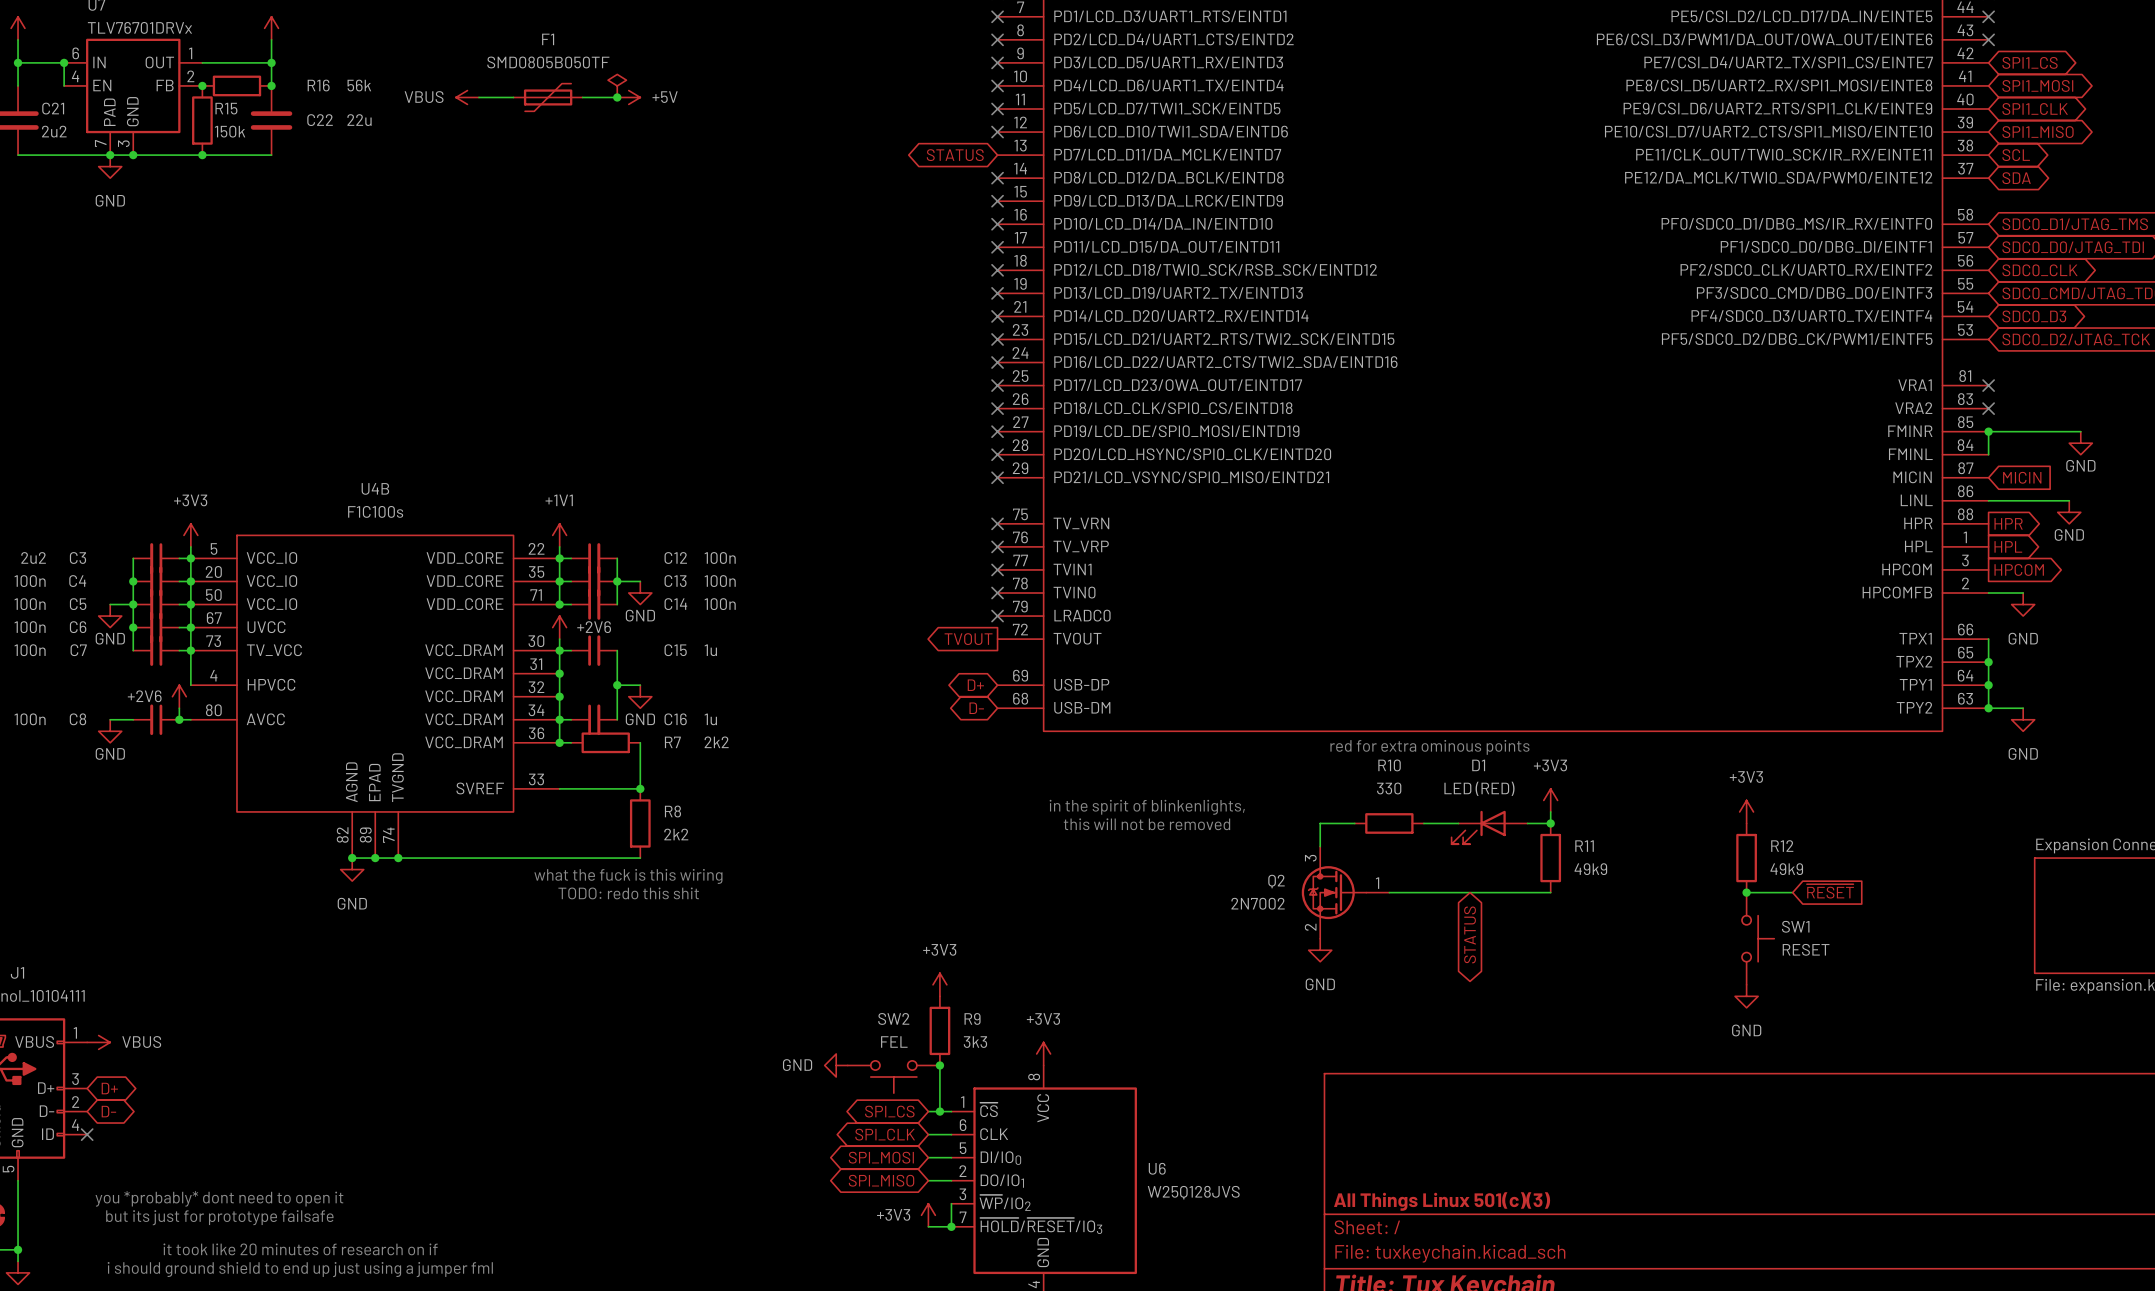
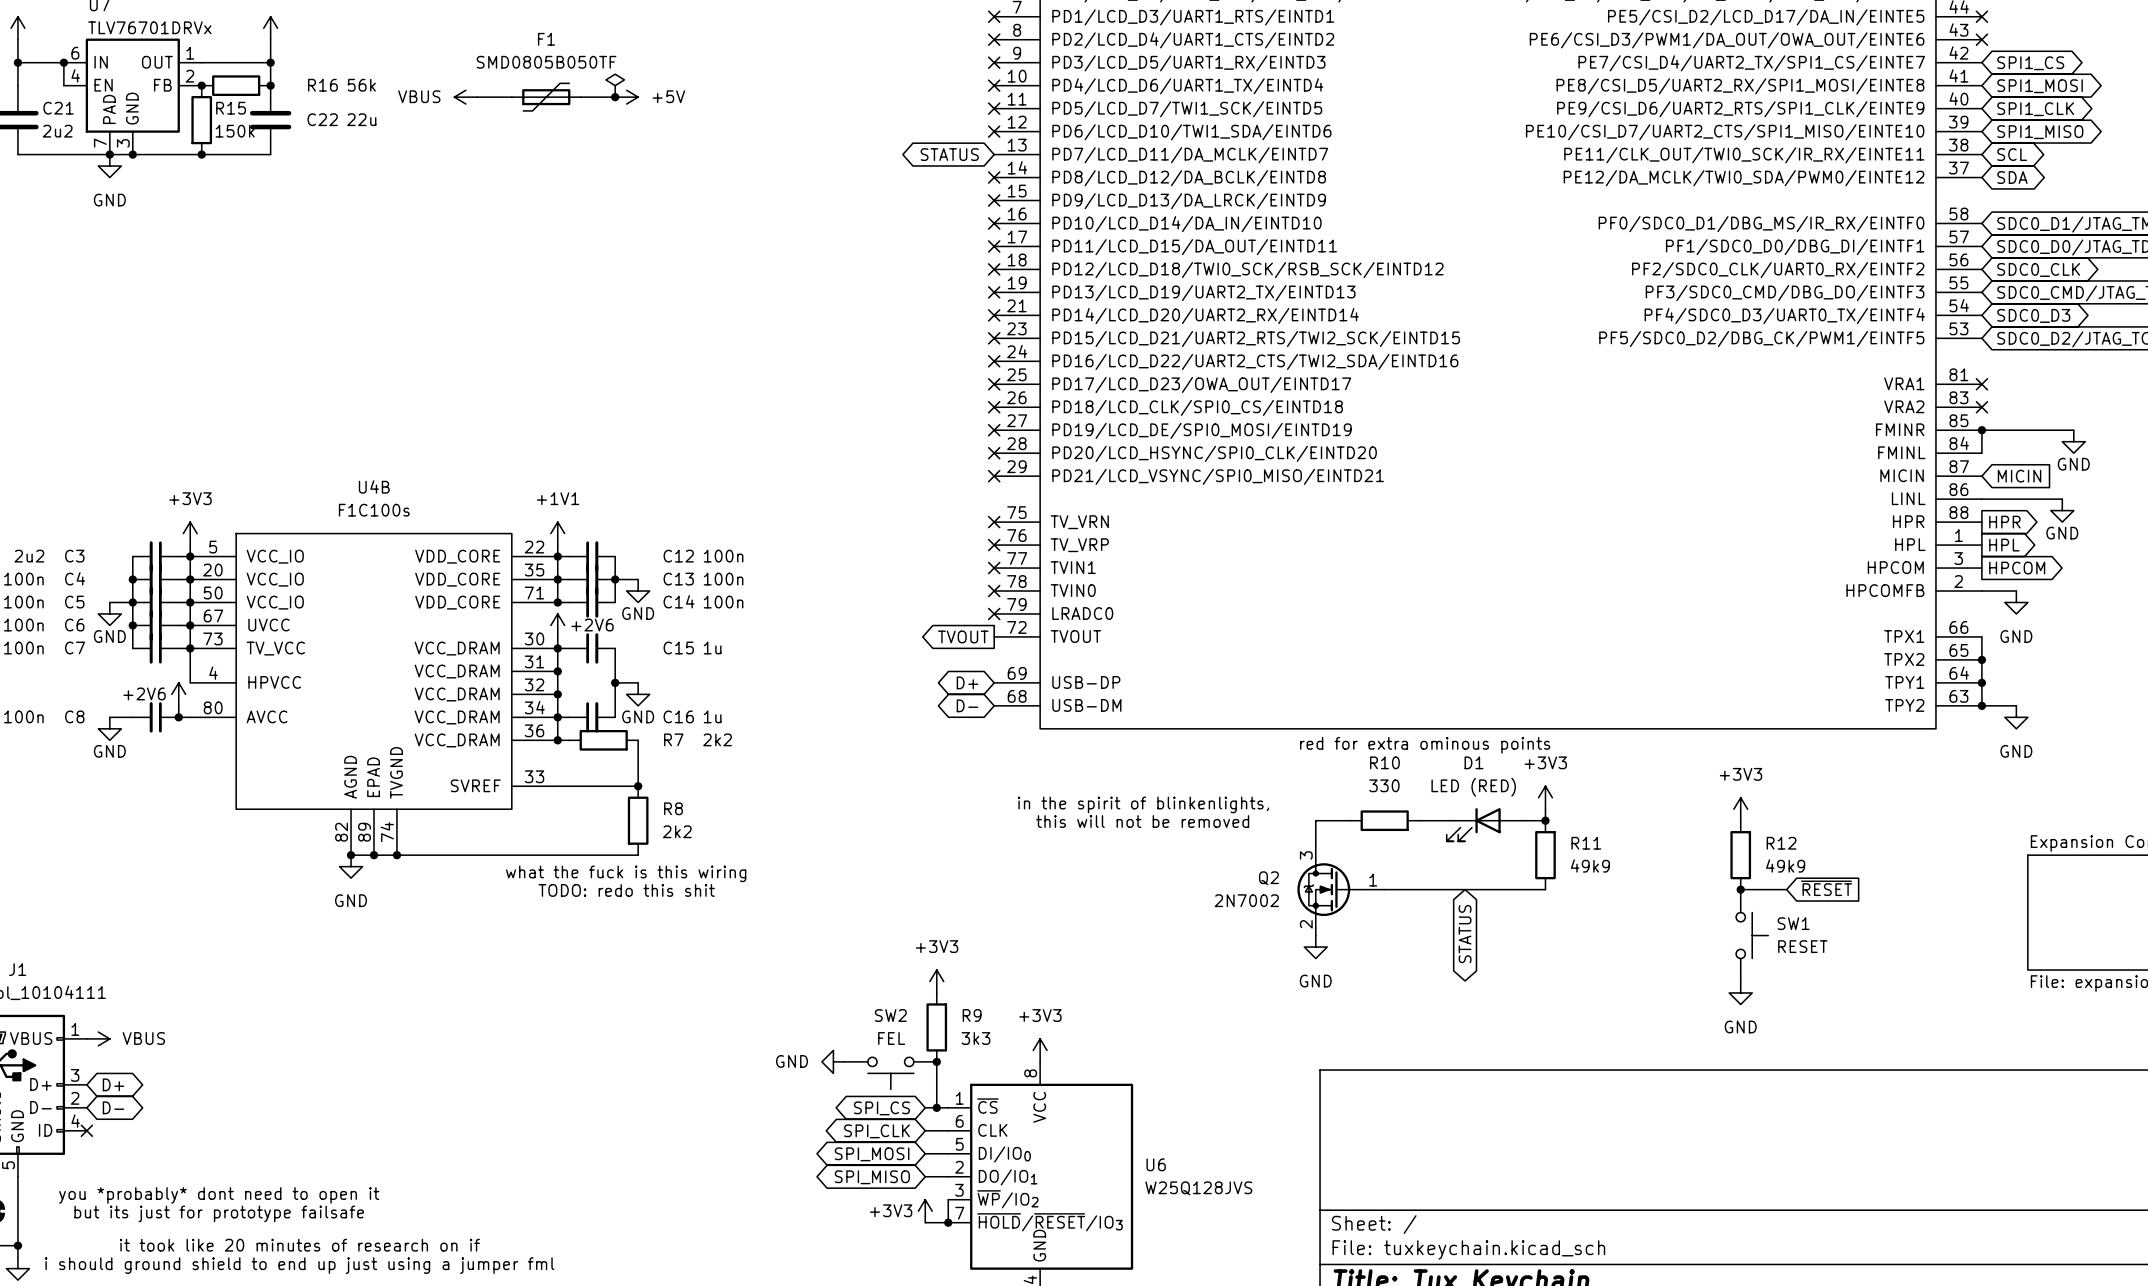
title block: All Things Linux 501(c)(3) (1442, 1201) -> none

